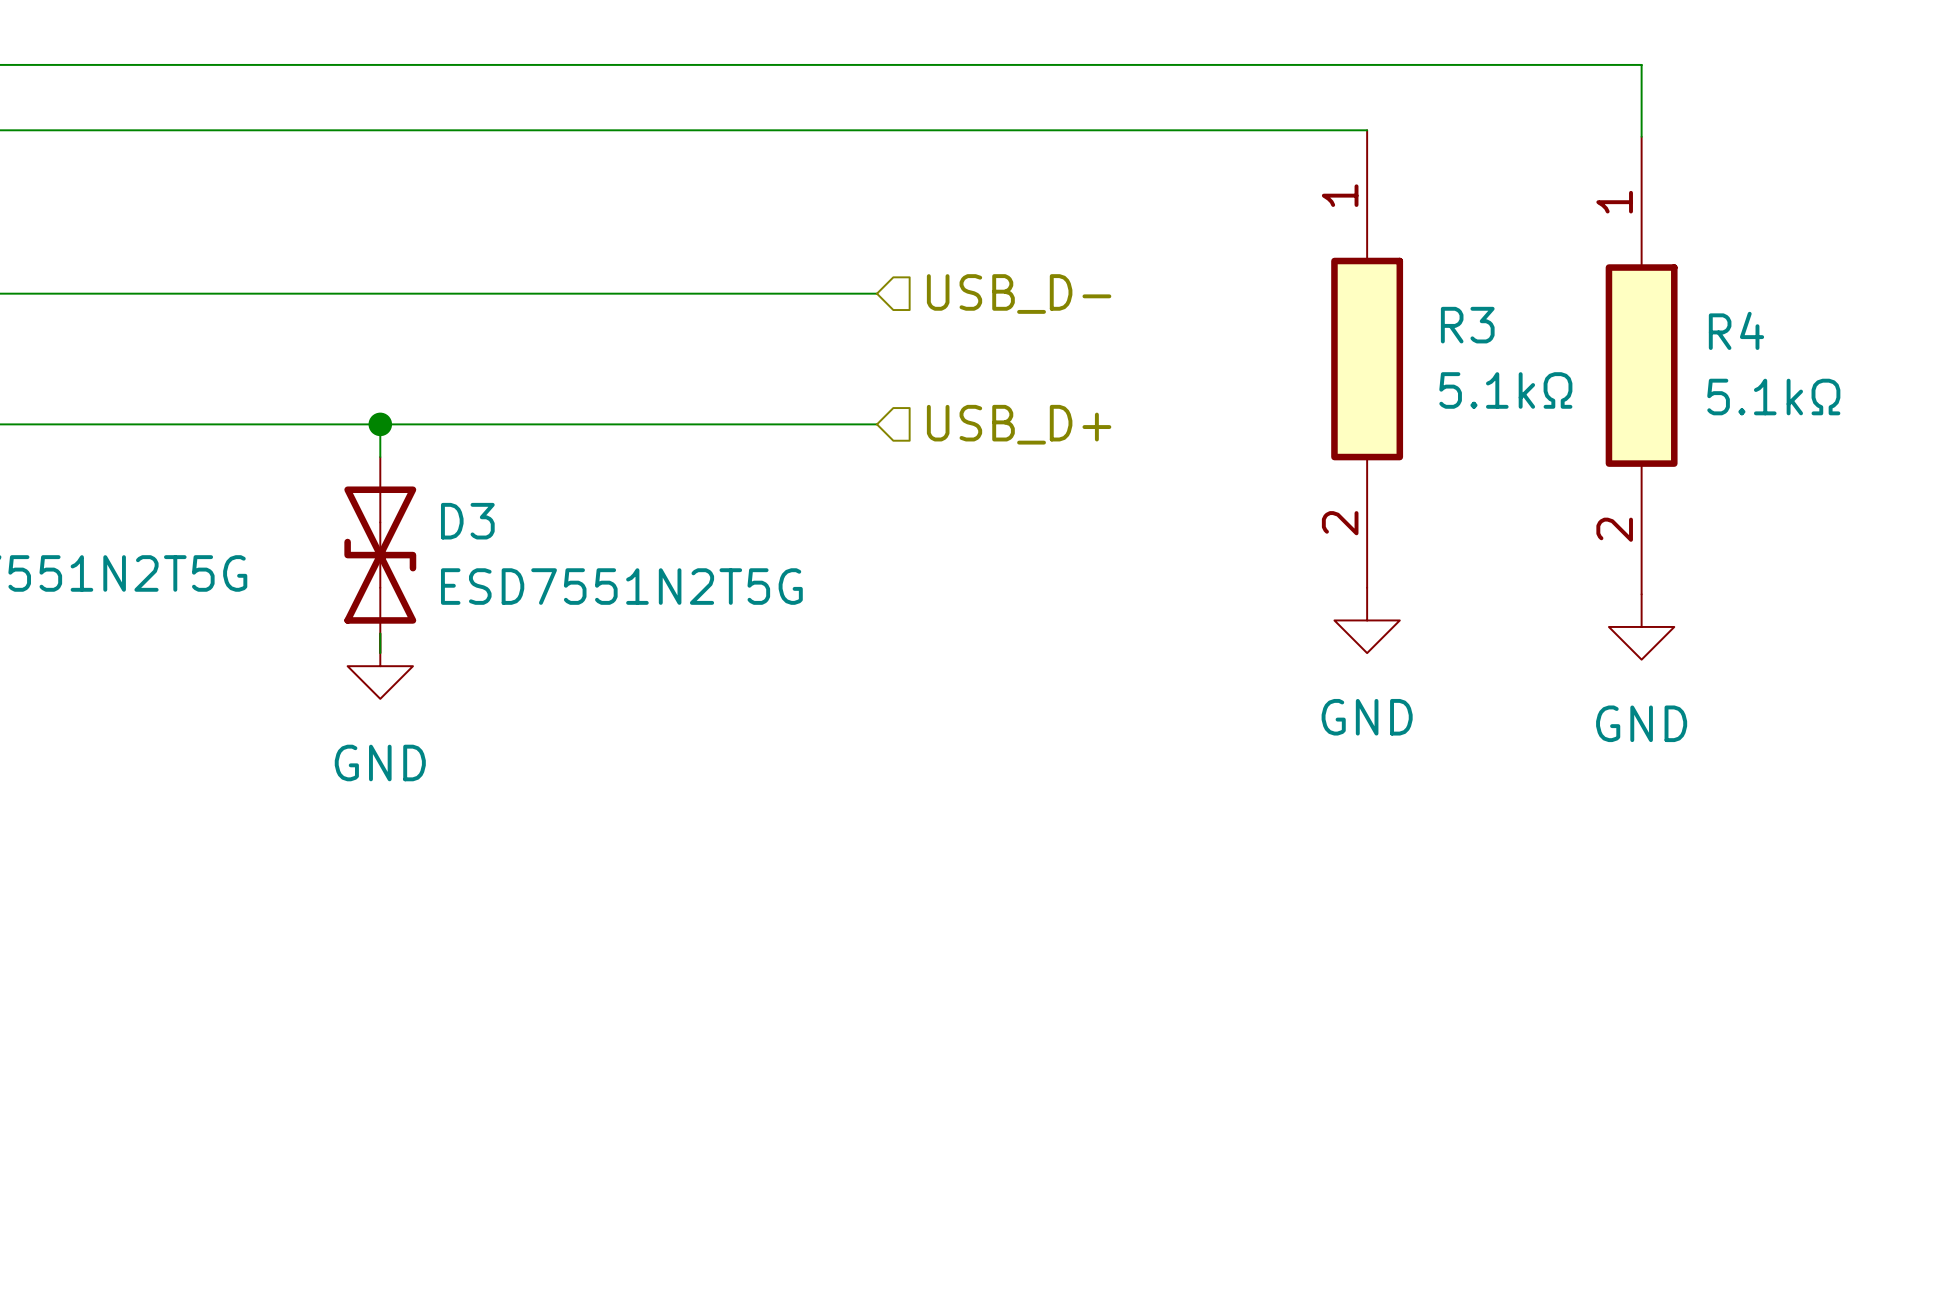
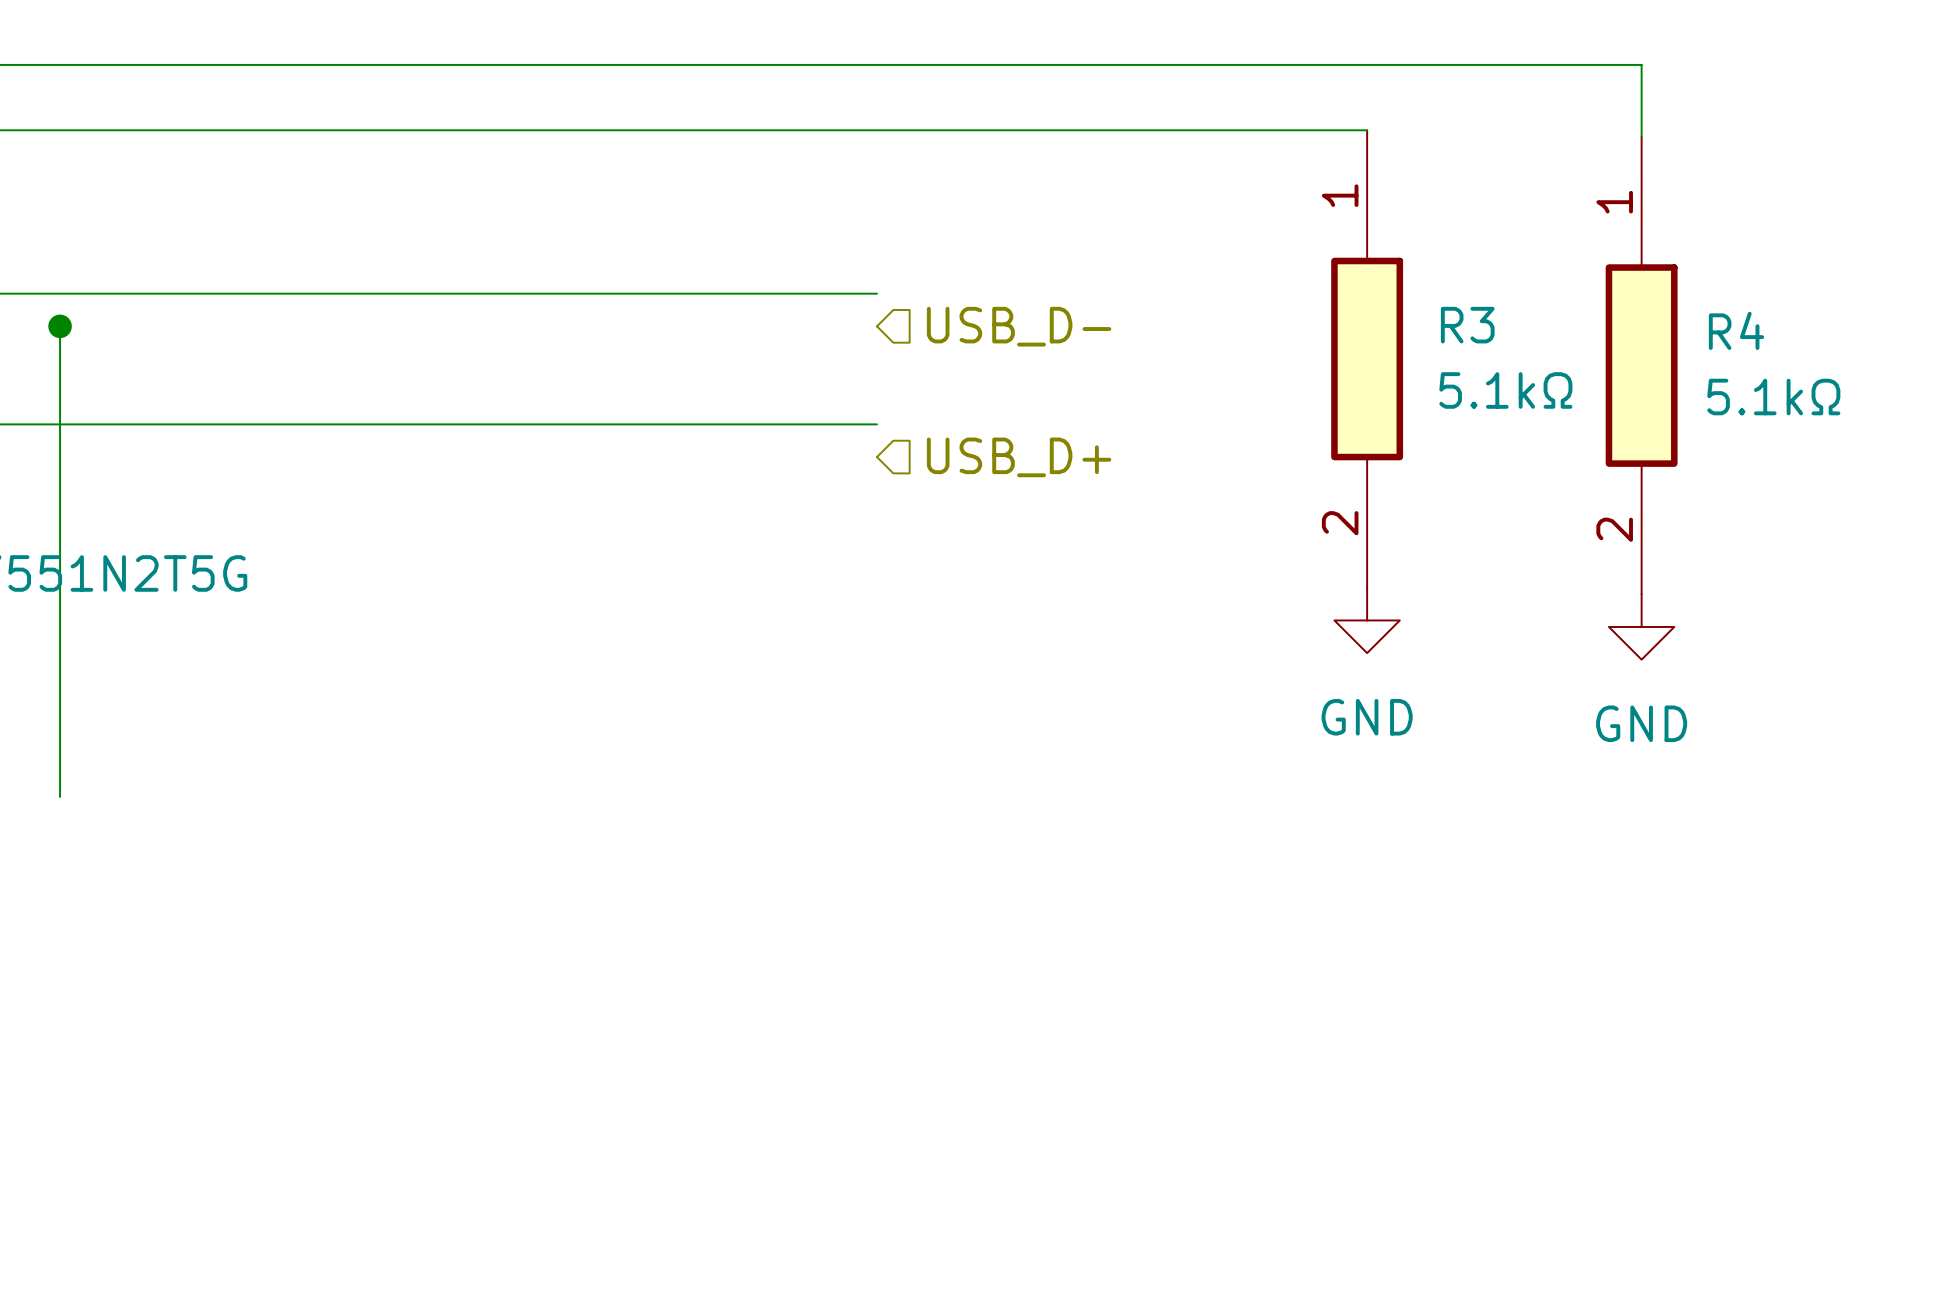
hierarchical label position: USB_D- (1019, 294) -> USB_D- (1019, 326)
wire: none -> (60, 326) (60, 796)
junction: none -> (60, 326)
wire: (380, 424) (380, 457) -> none
junction: (380, 424) -> none
hierarchical label position: USB_D+ (1019, 424) -> USB_D+ (1019, 457)
D3: ESD7551N2T5G (380, 555) -> none
wire: (380, 633) (380, 653) -> none
power symbol: GND (380, 666) -> none

